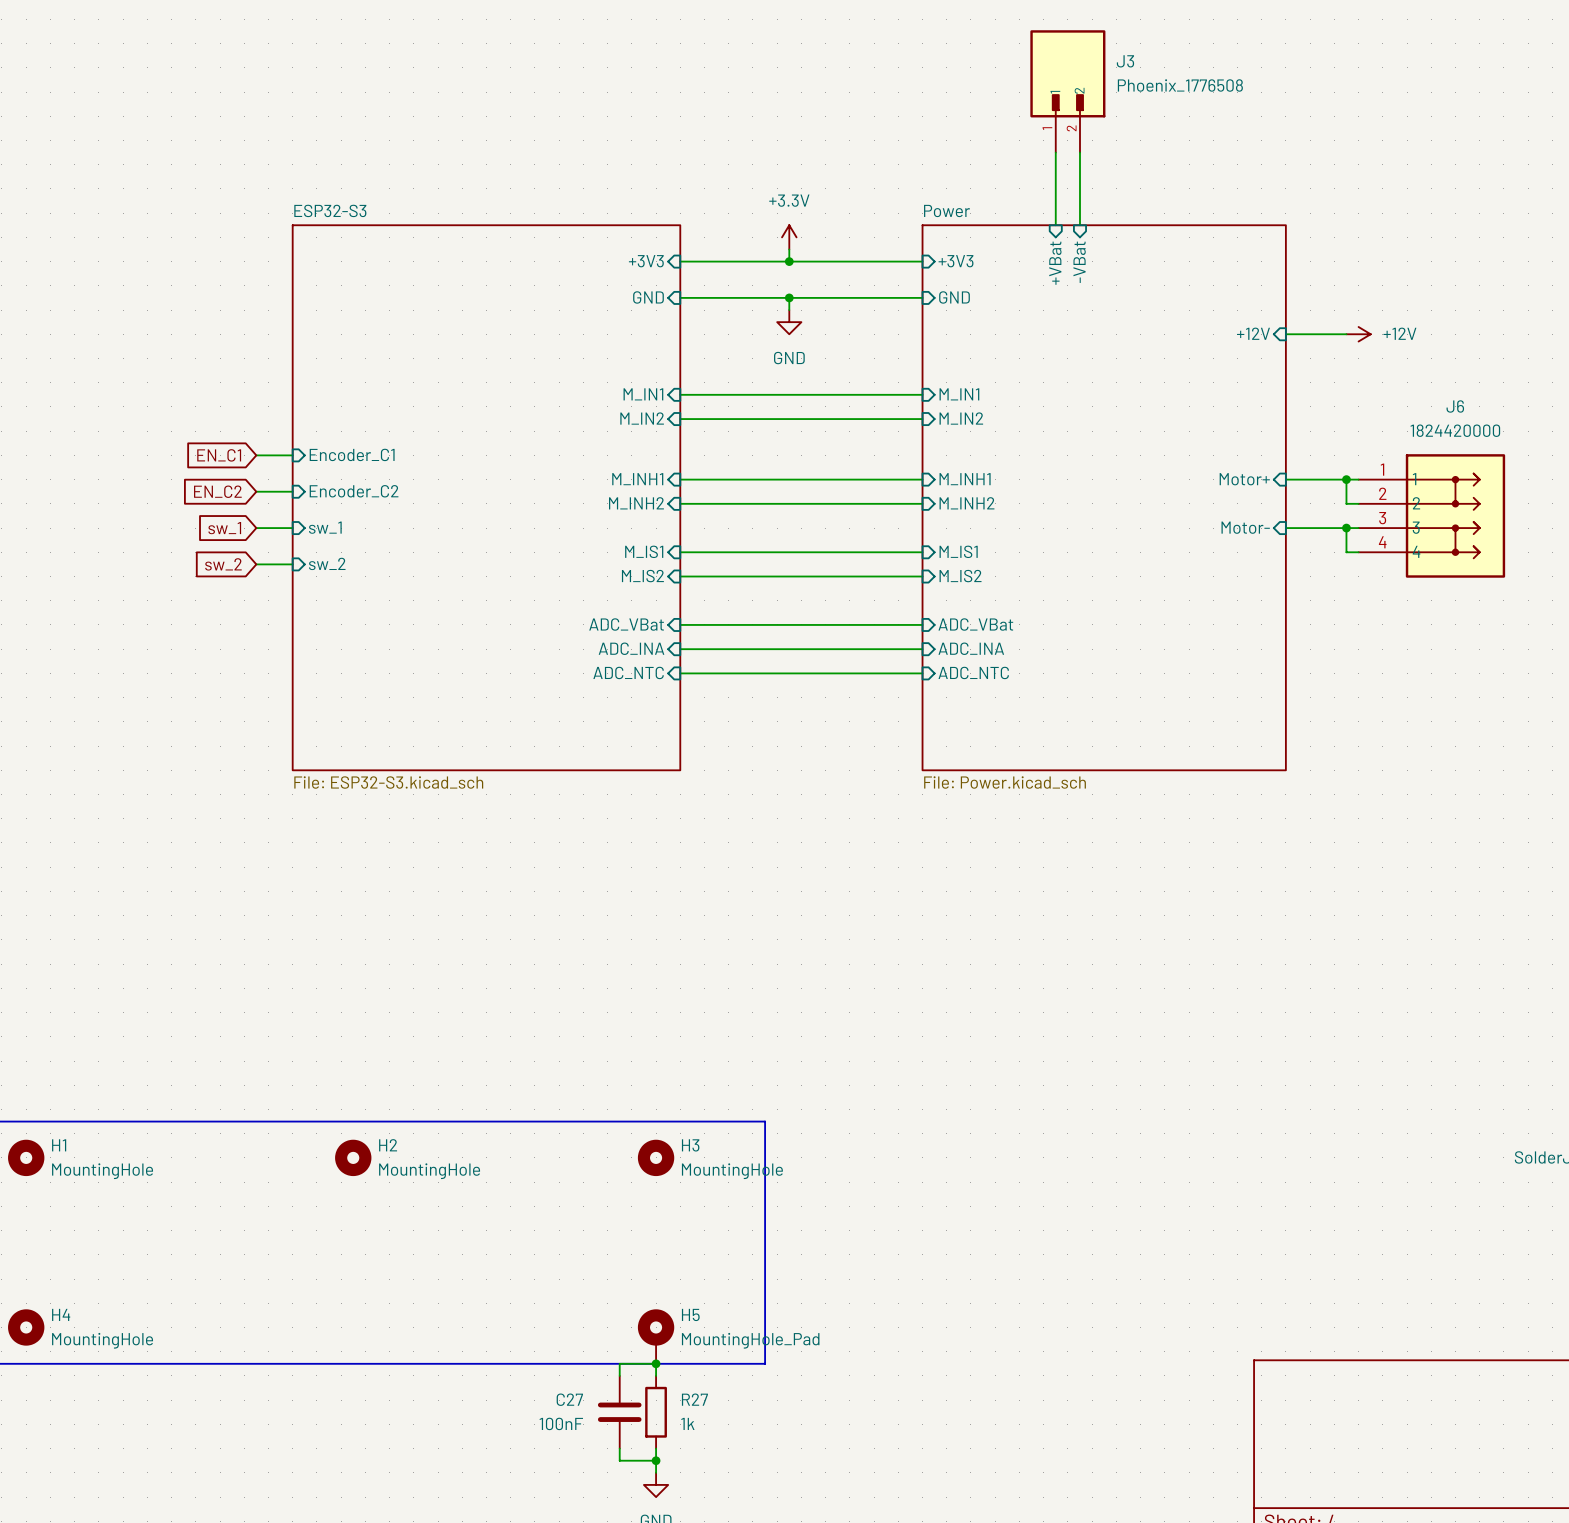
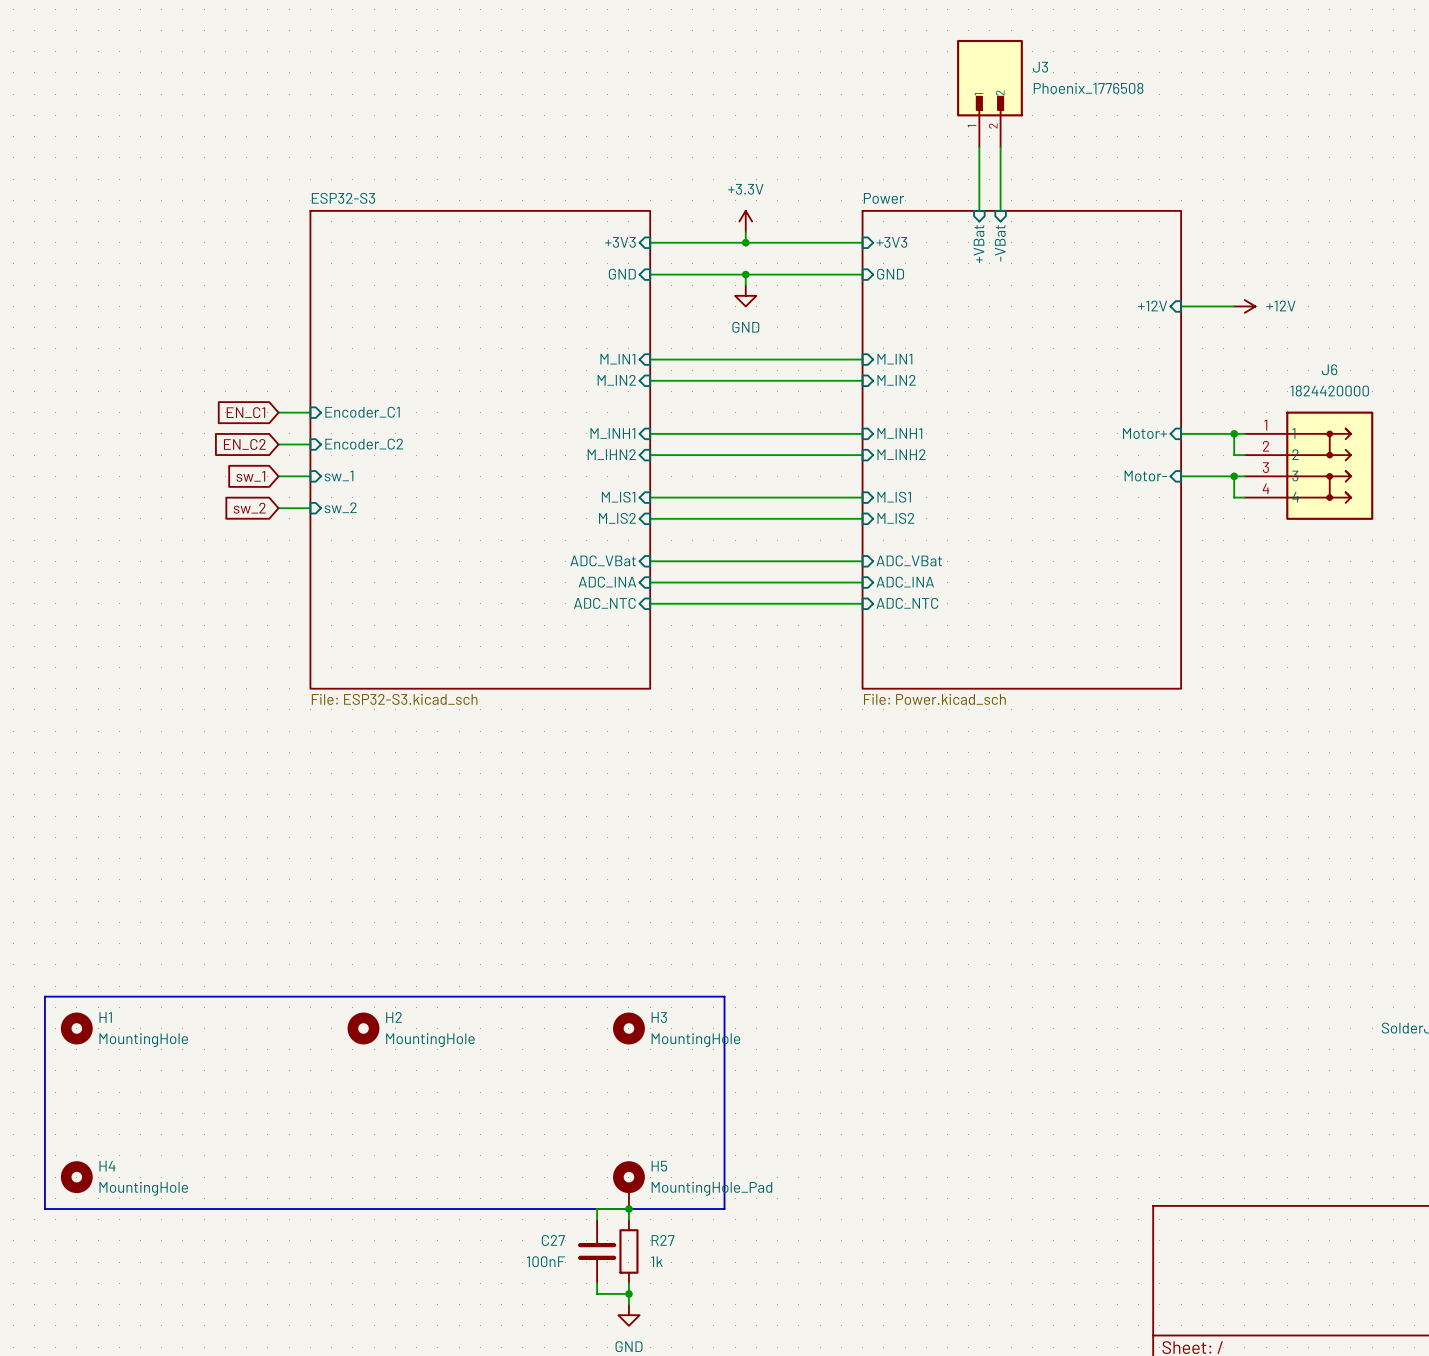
sheet pin: M_INH2 (636, 503) -> M_IHN2 (611, 454)

